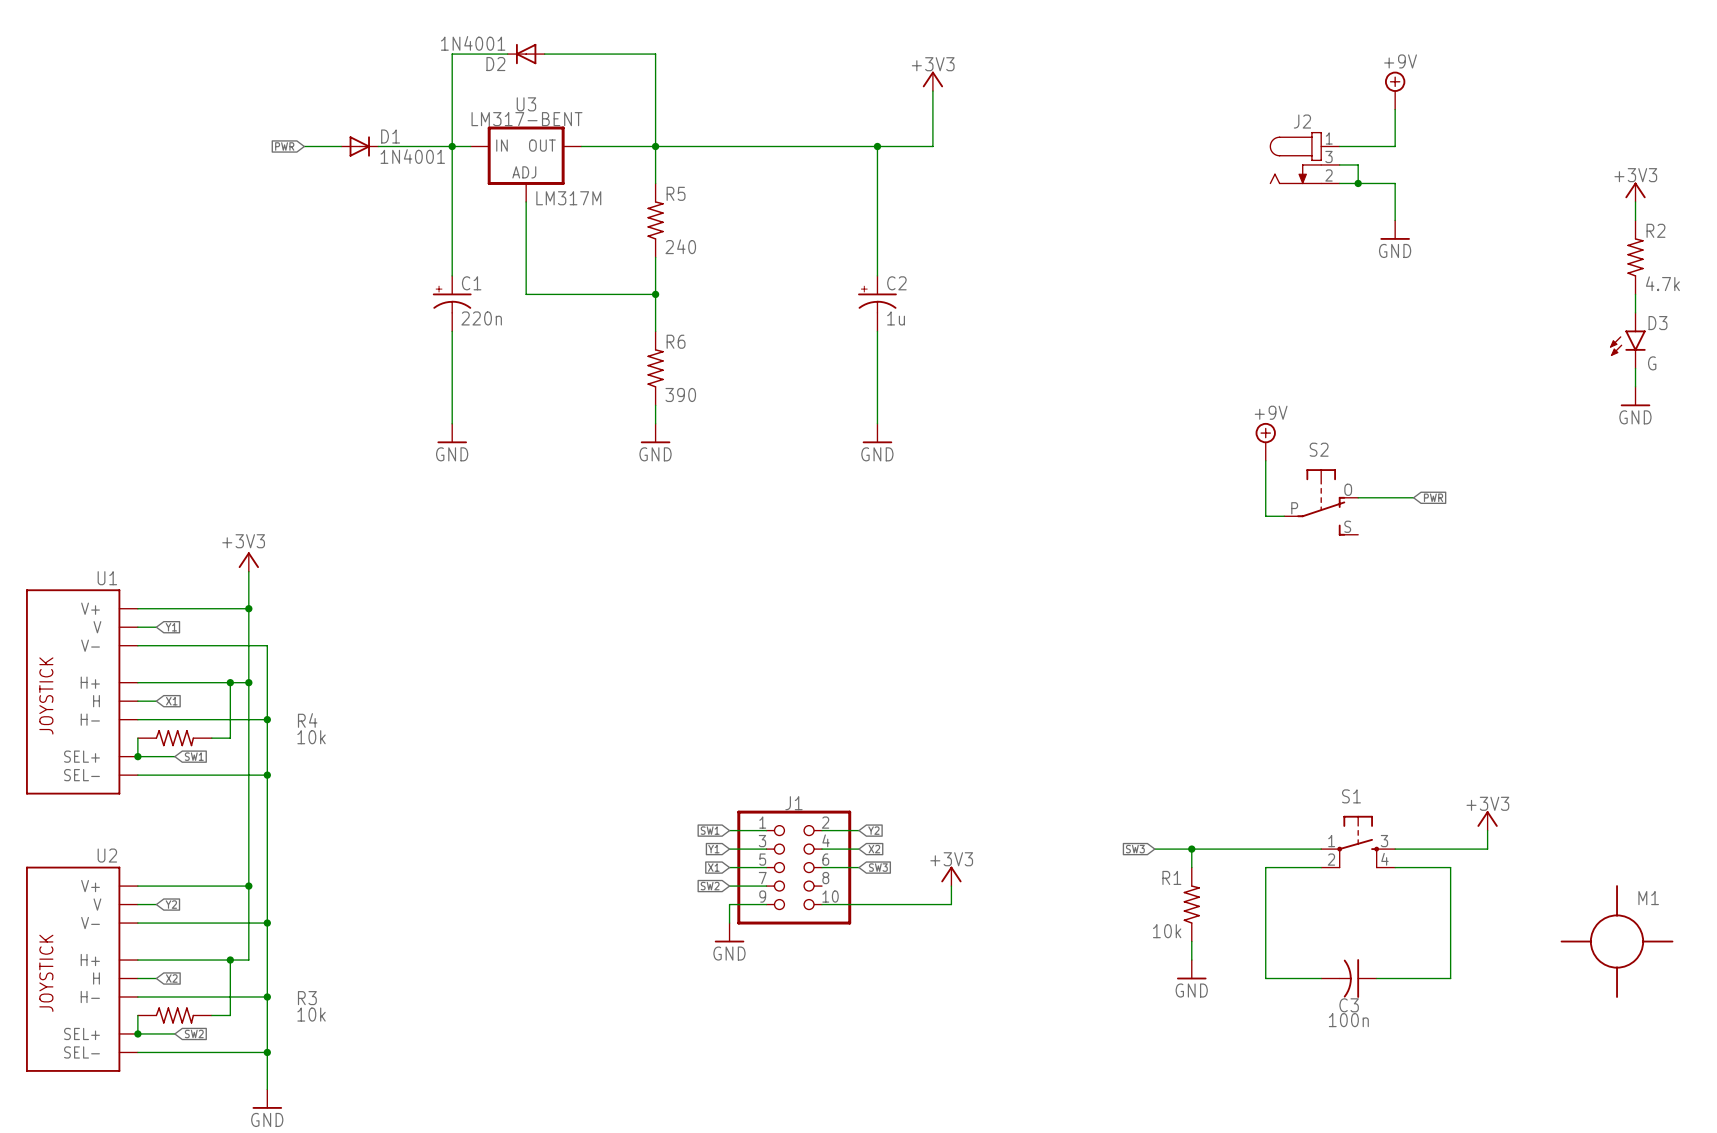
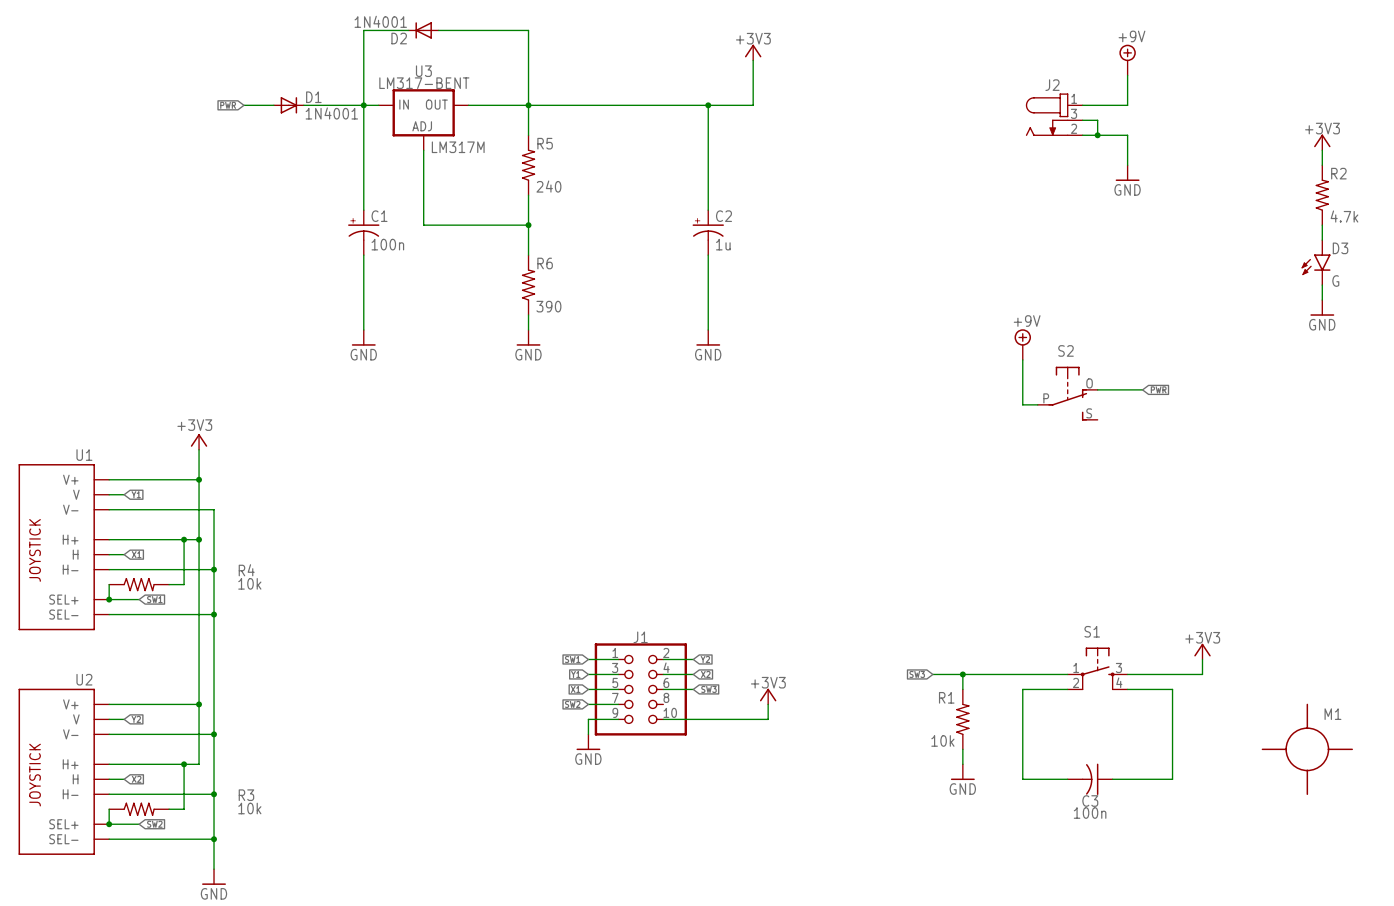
C1 value: 220n (481, 318) -> 100n (387, 244)

